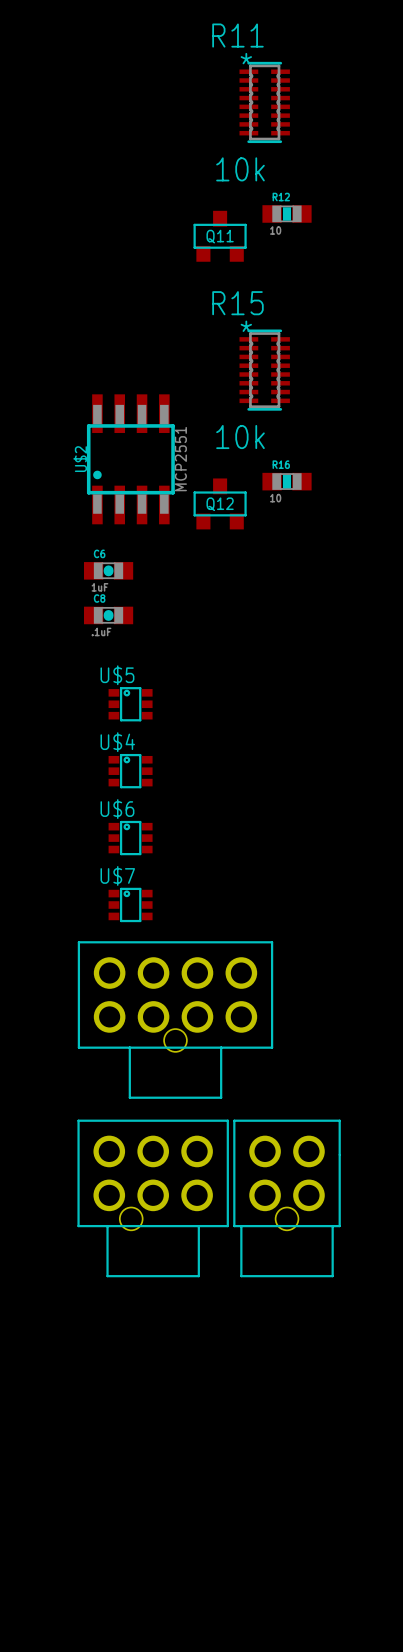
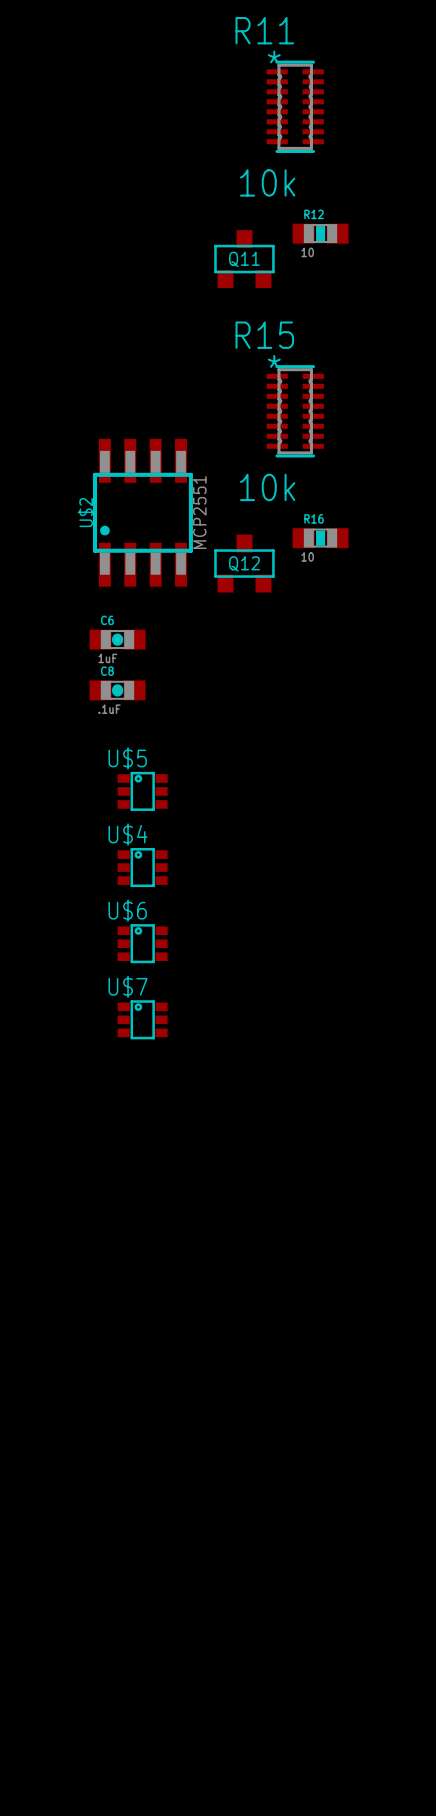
part: (175, 1020) -> none
part: (153, 1198) -> none
part: (287, 1198) -> none

